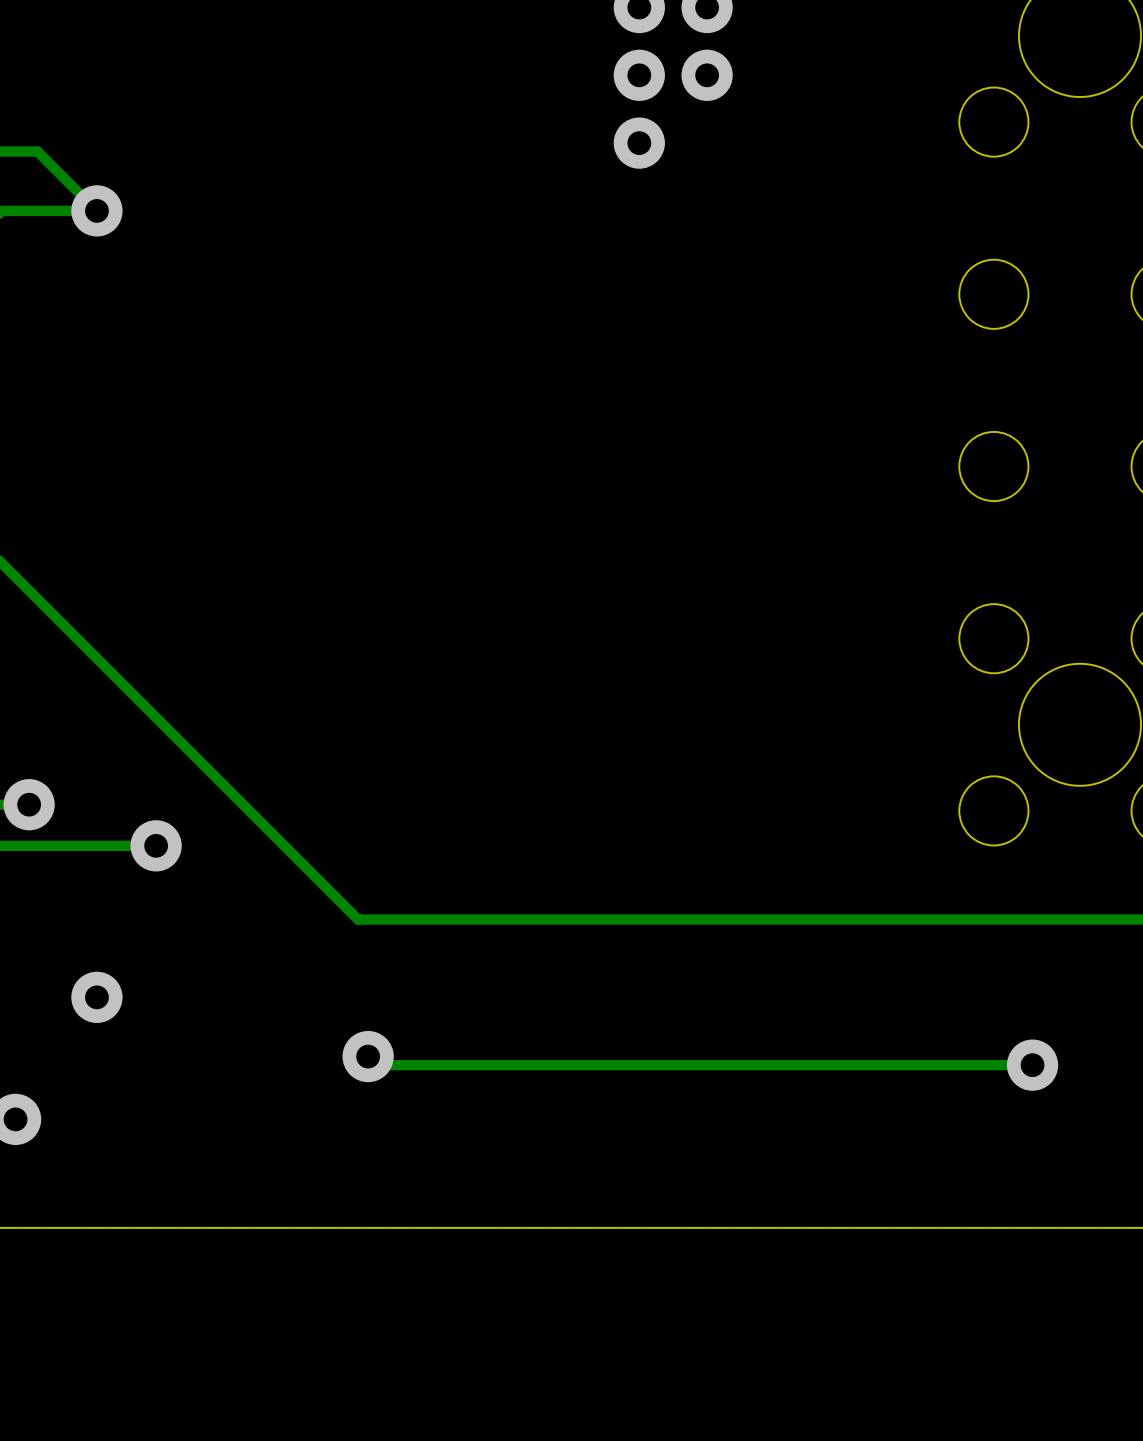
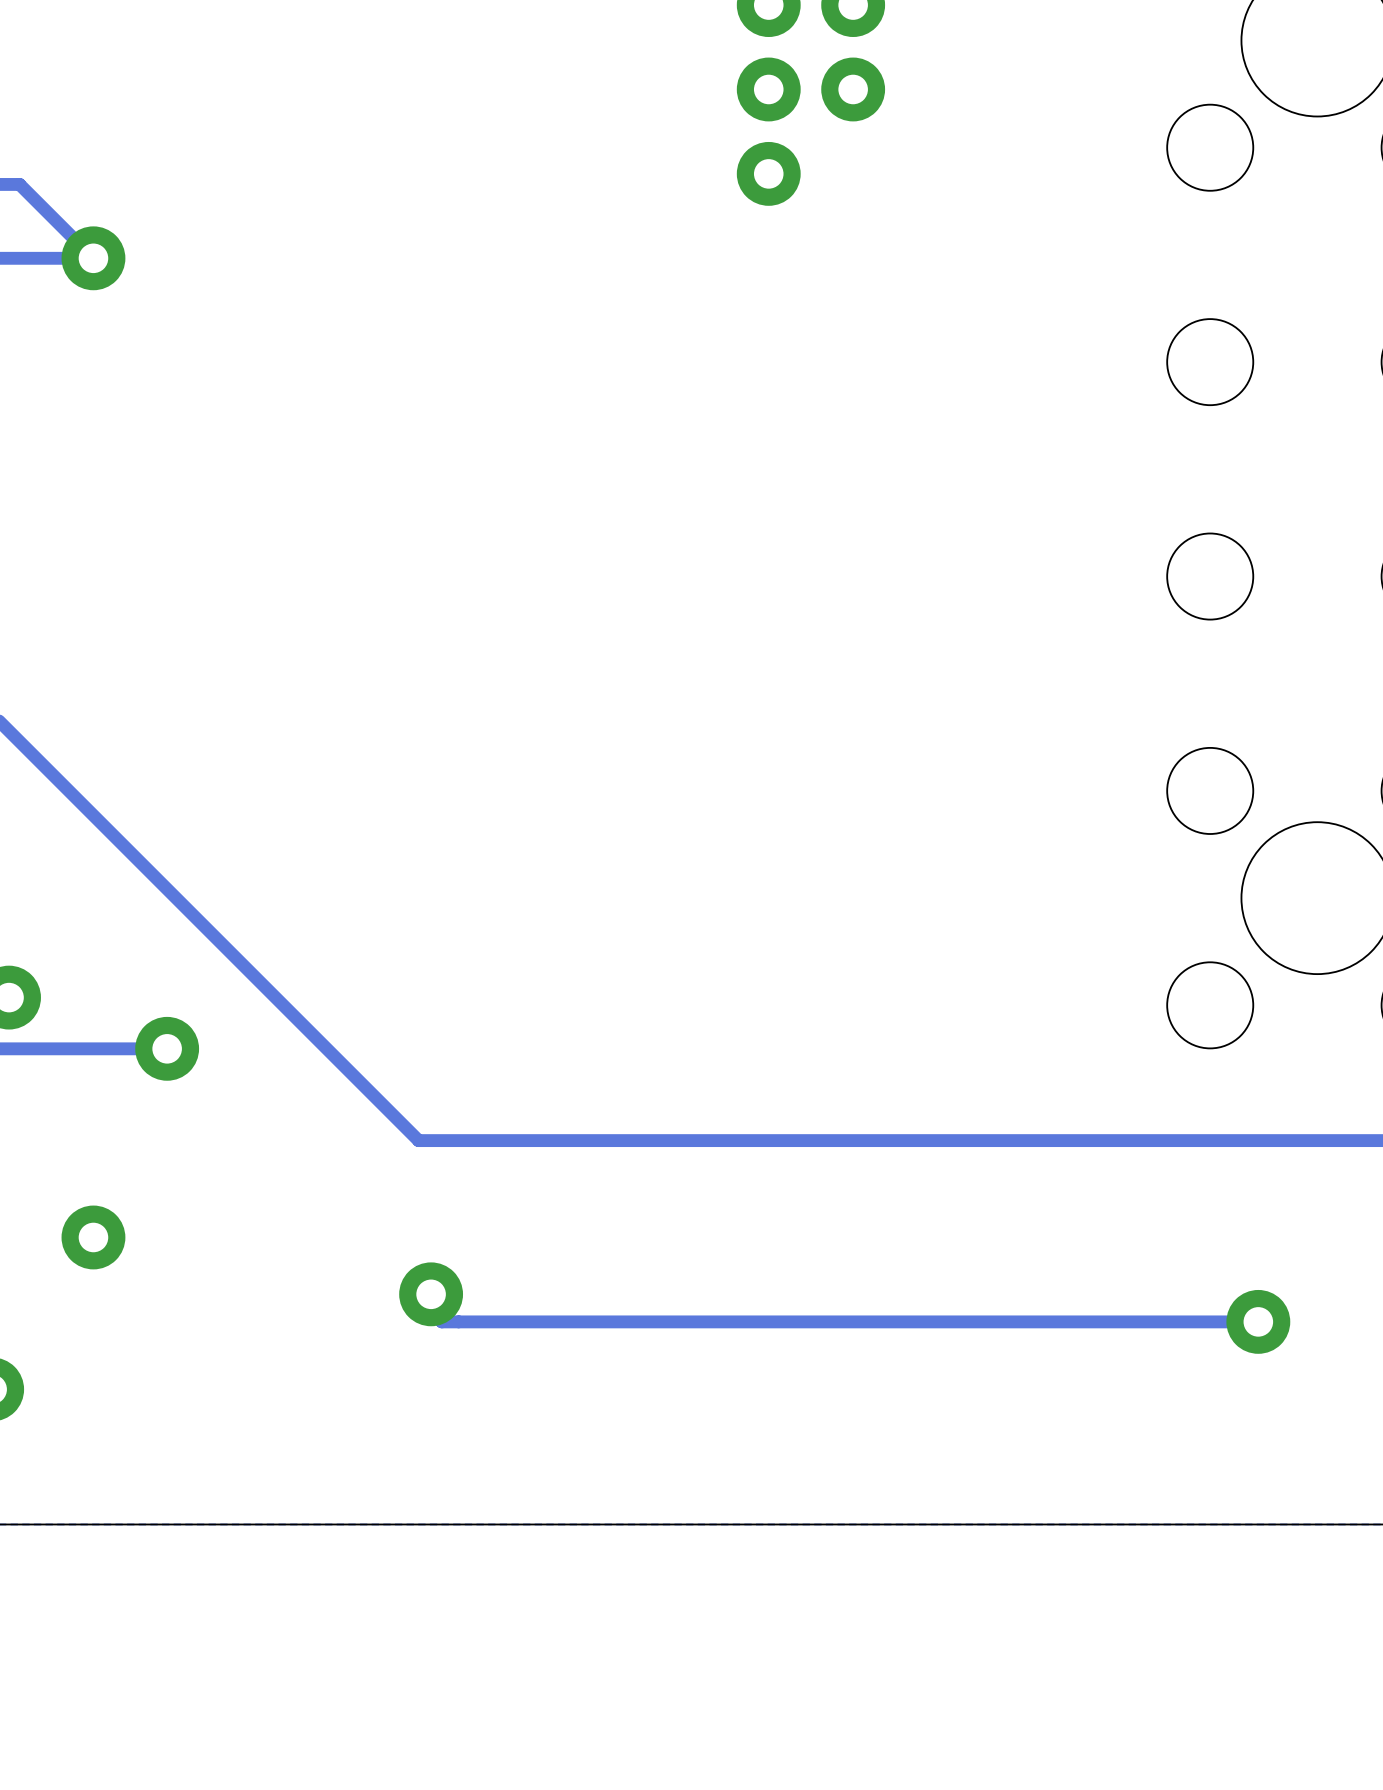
via position: (368, 1056) -> (431, 1294)

